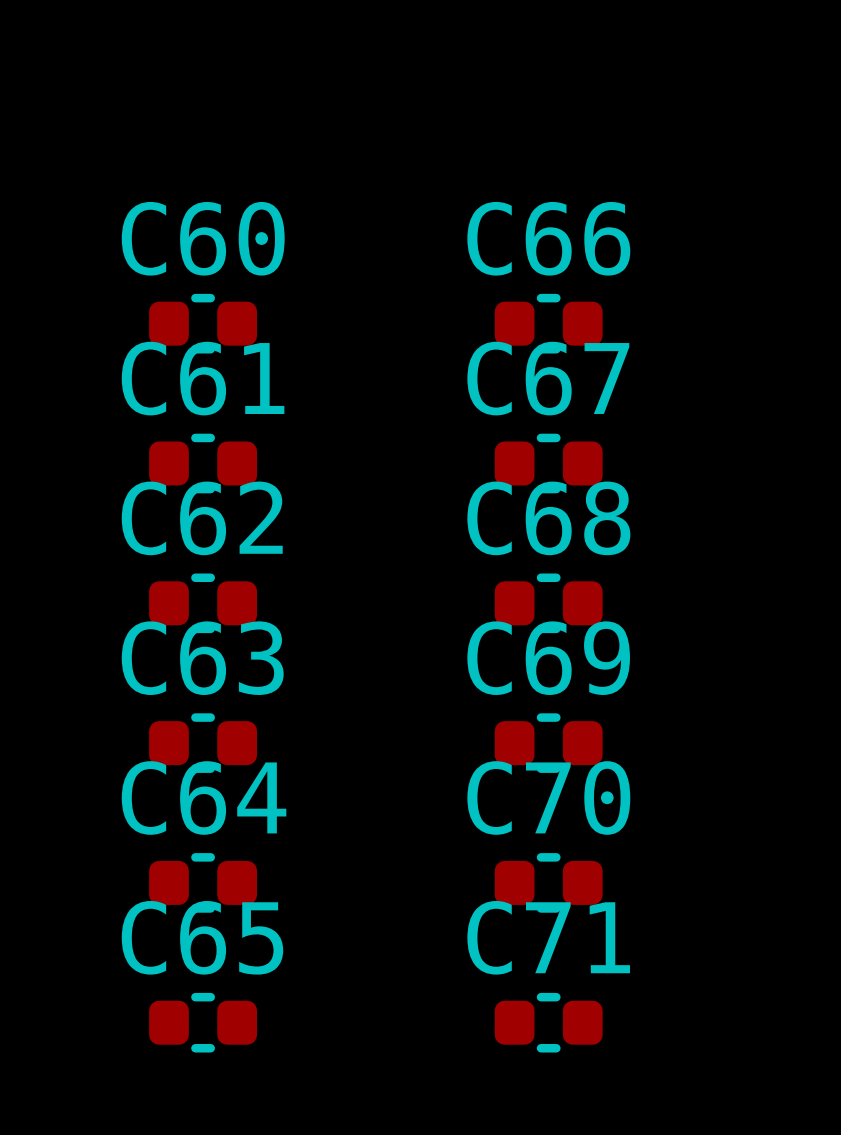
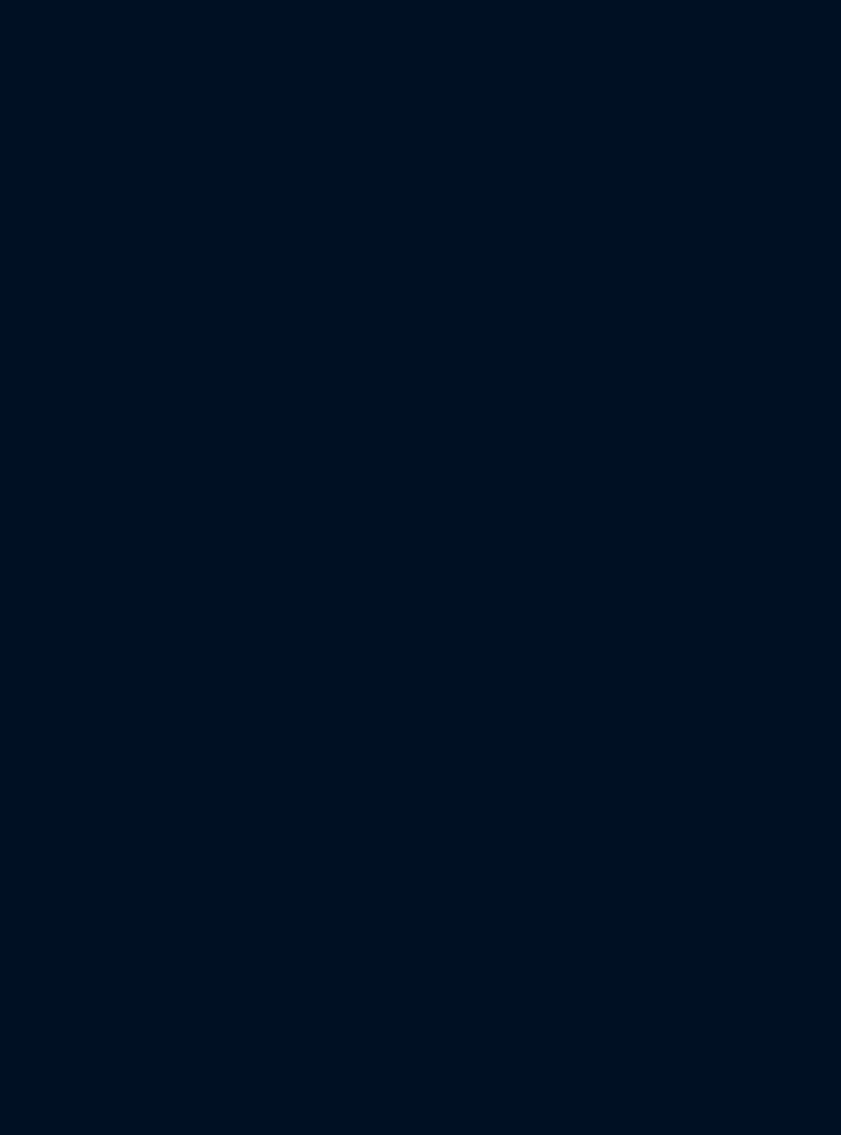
C60: (203, 323) -> none
C66: (548, 323) -> none
C61: (203, 463) -> none
C67: (548, 463) -> none
C62: (203, 603) -> none
C68: (548, 603) -> none
C63: (203, 743) -> none
C69: (548, 743) -> none
C64: (203, 882) -> none
C70: (548, 882) -> none
C65: (203, 1022) -> none
C71: (548, 1022) -> none

